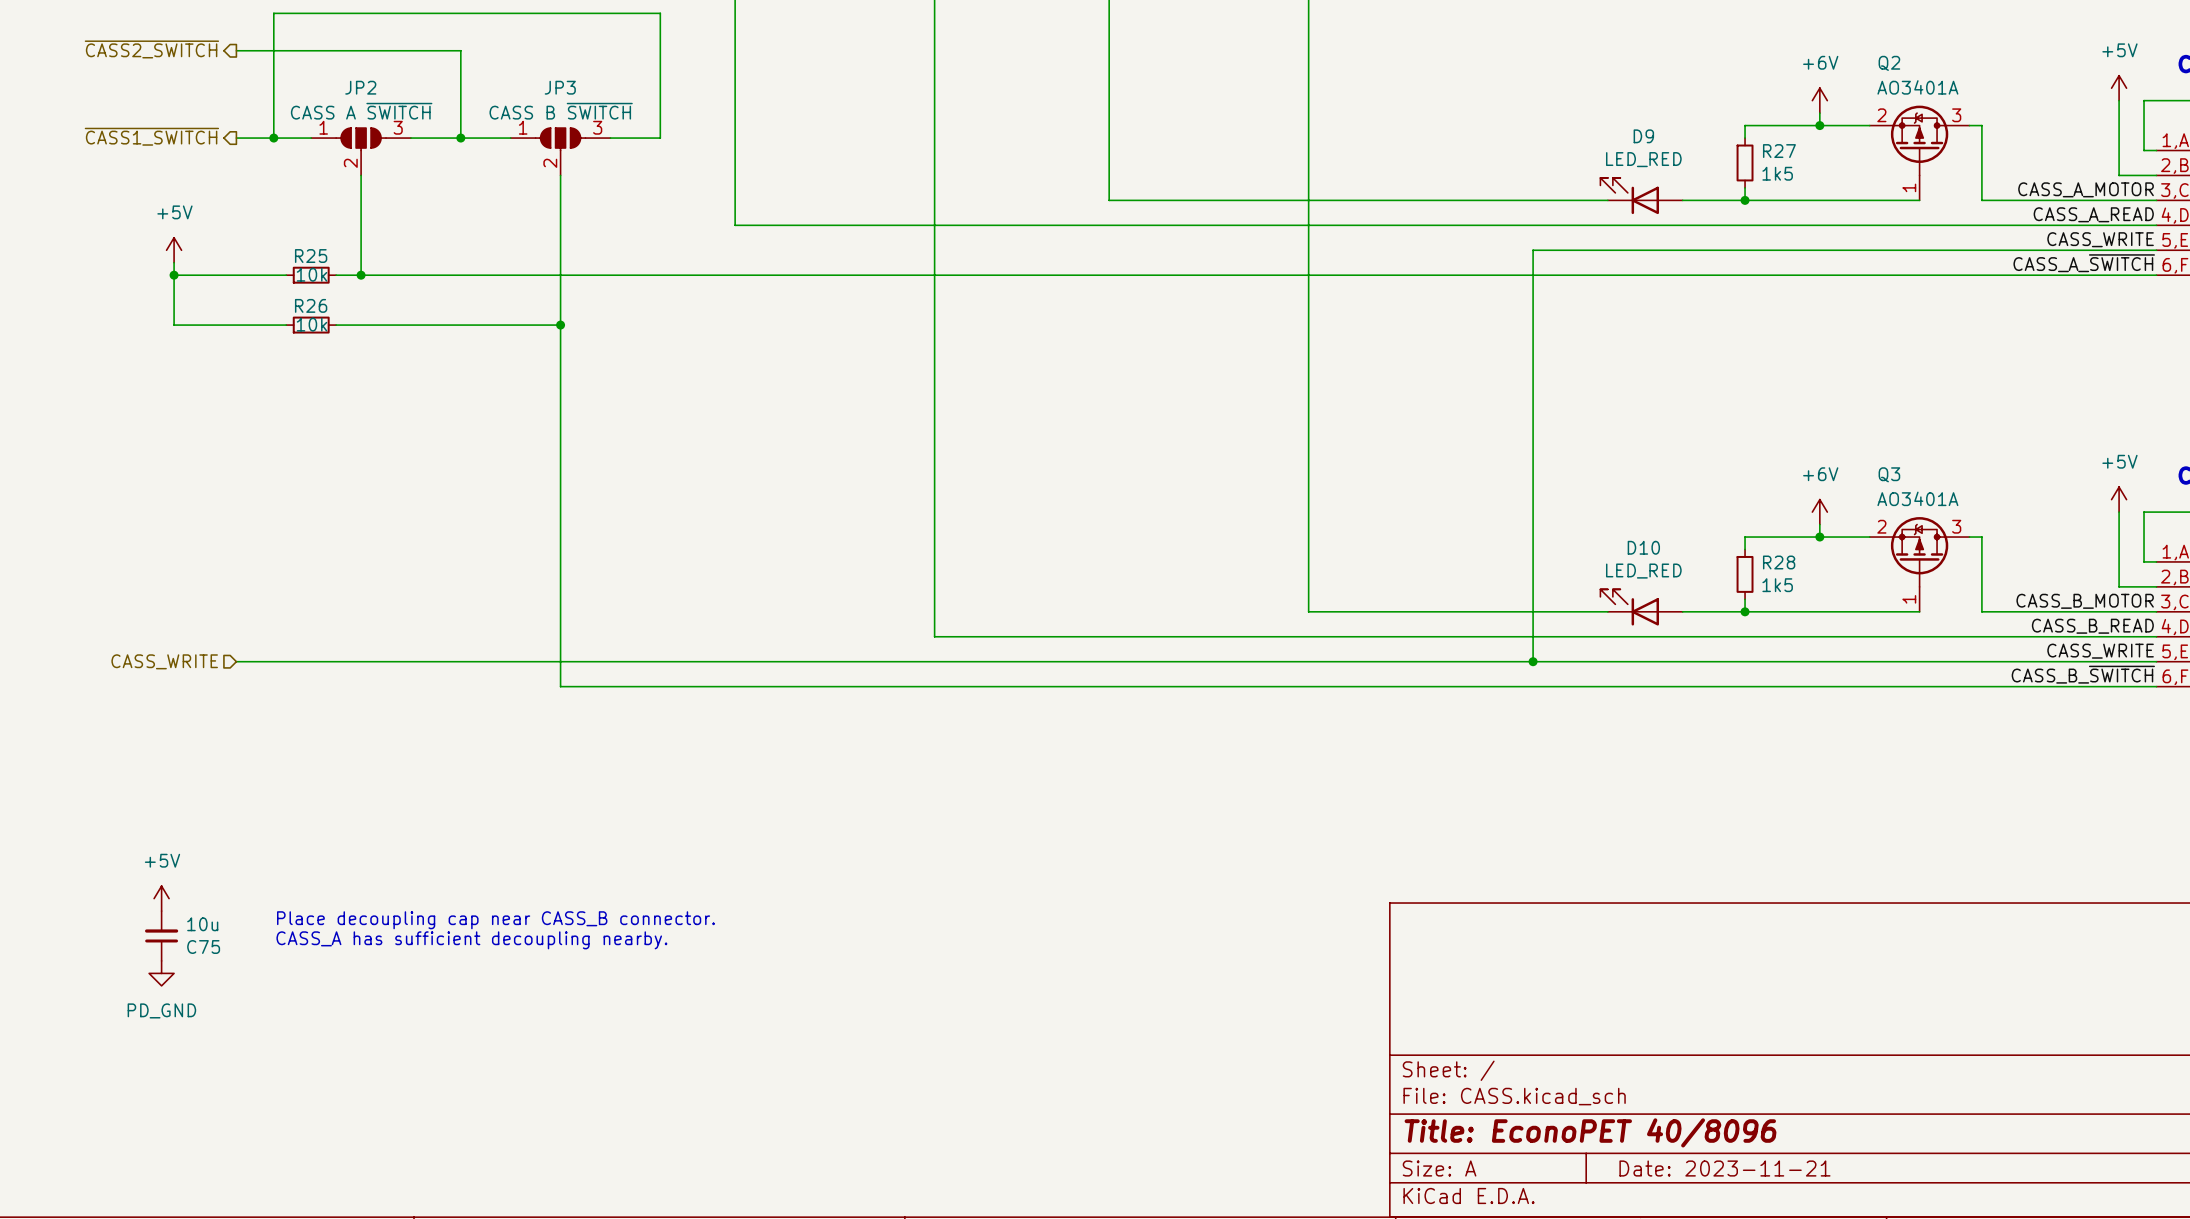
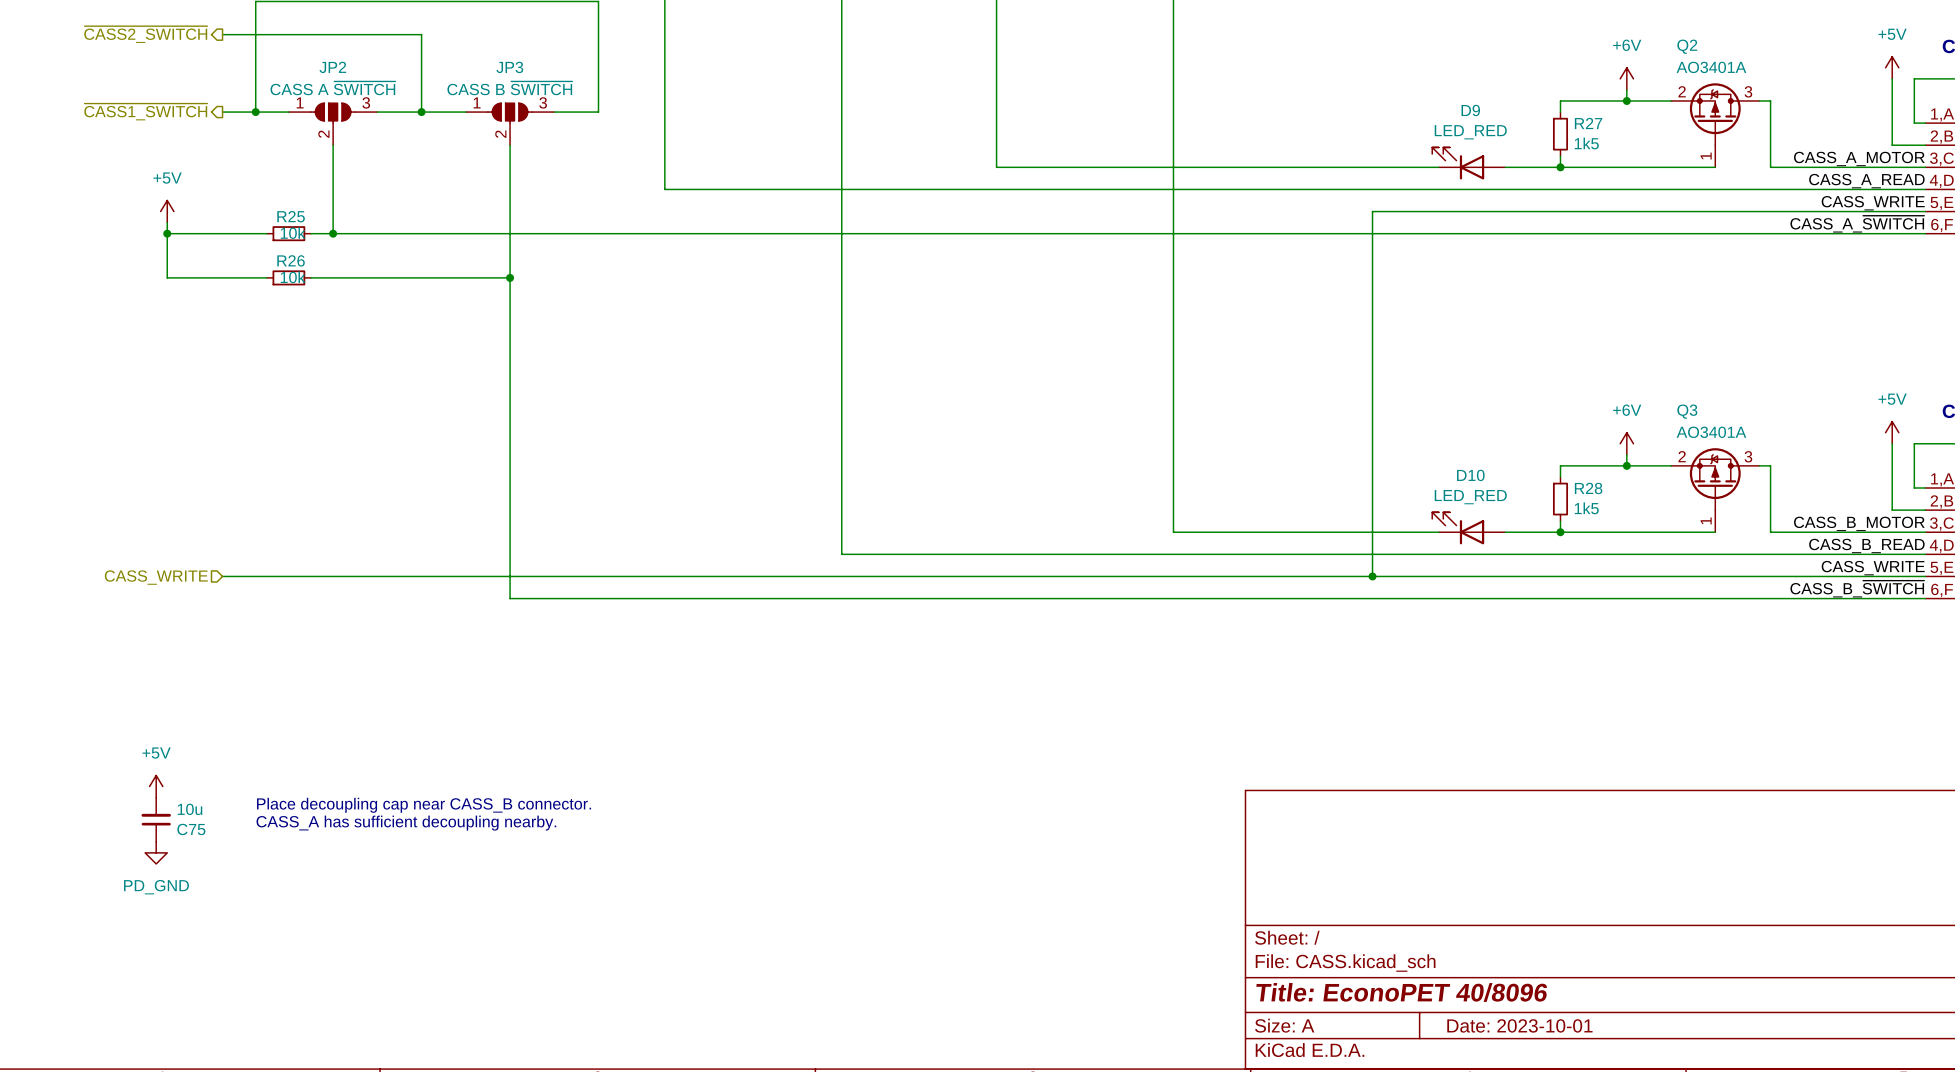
title block: Date: 2023-11-21 (1724, 1168) -> Date: 2023-10-01 (1519, 1025)

